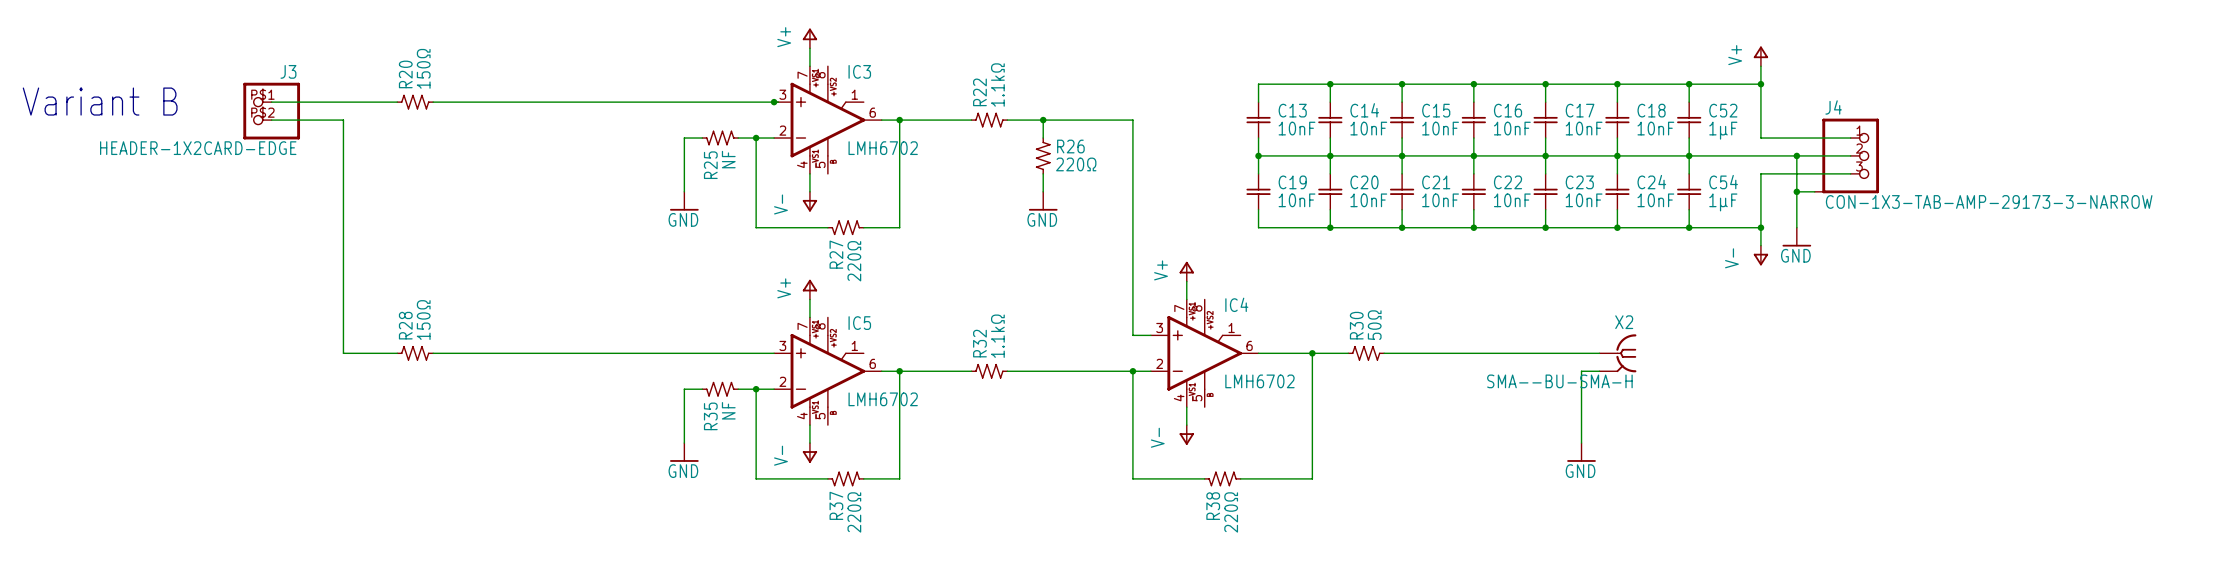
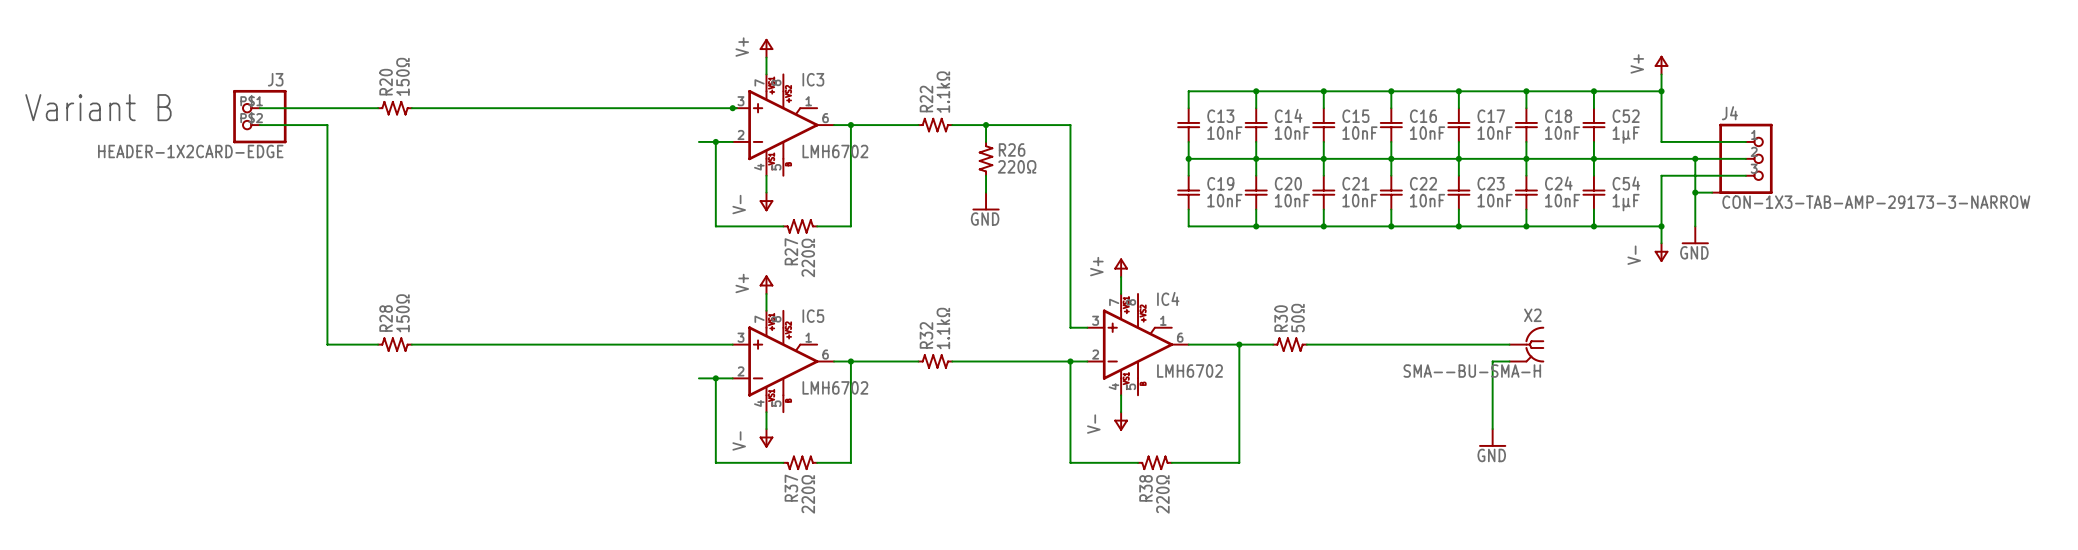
wire: (702, 138) (684, 138) (684, 191) -> none
R25: NF (720, 138) -> none
power symbol: GND (684, 201) -> none
wire: (702, 389) (684, 389) (684, 443) -> none
R35: NF (720, 389) -> none
power symbol: GND (684, 452) -> none

